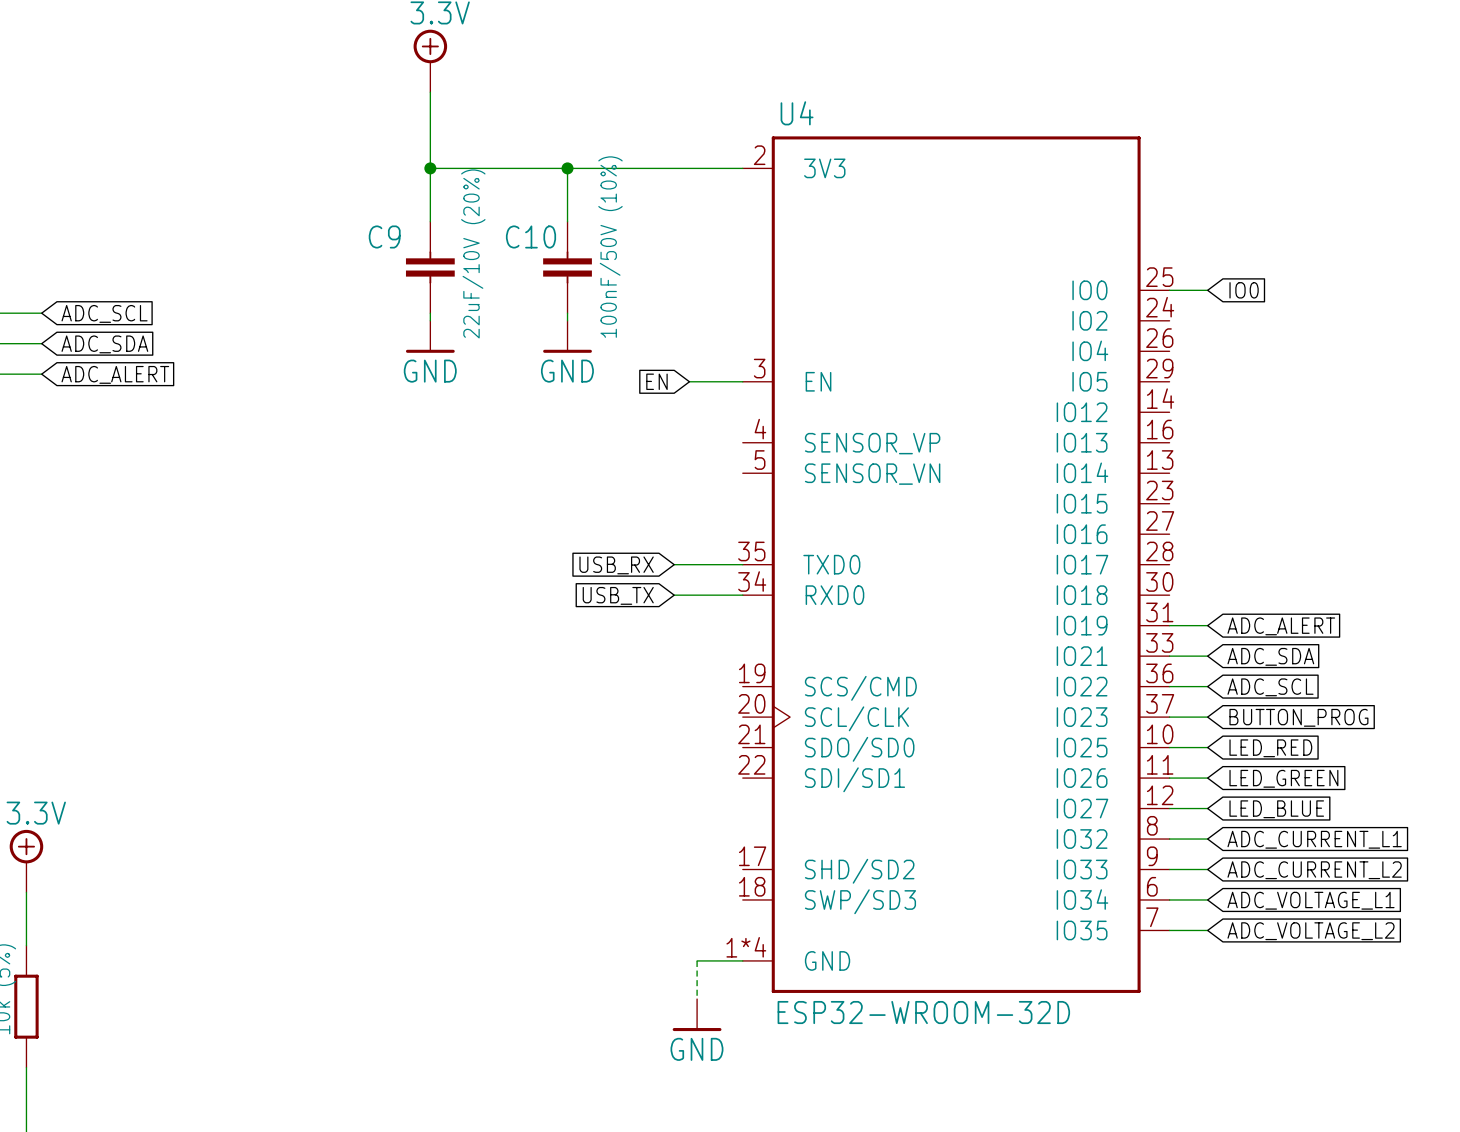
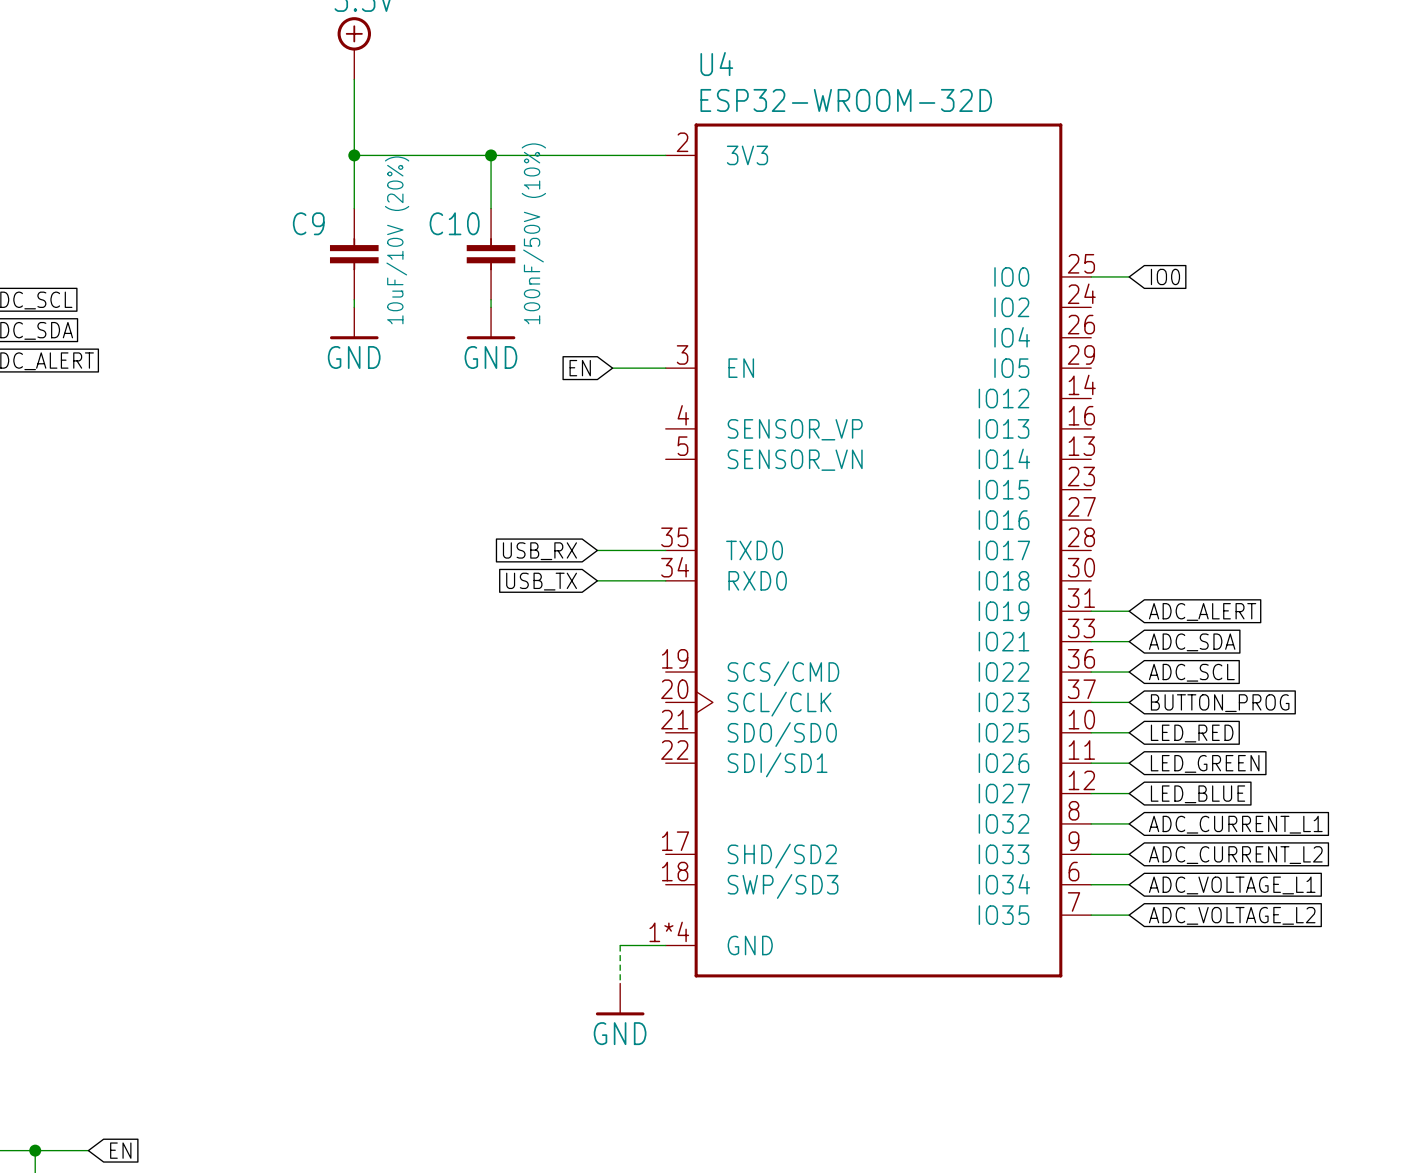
U4 name position: U4 (797, 113) -> U4 (716, 64)
C9 value: 22uF/10V (20%) (473, 253) -> 10uF/10V (20%) (397, 240)
U4 value position: ESP32-WROOM-32D (923, 1012) -> ESP32-WROOM-32D (846, 100)

